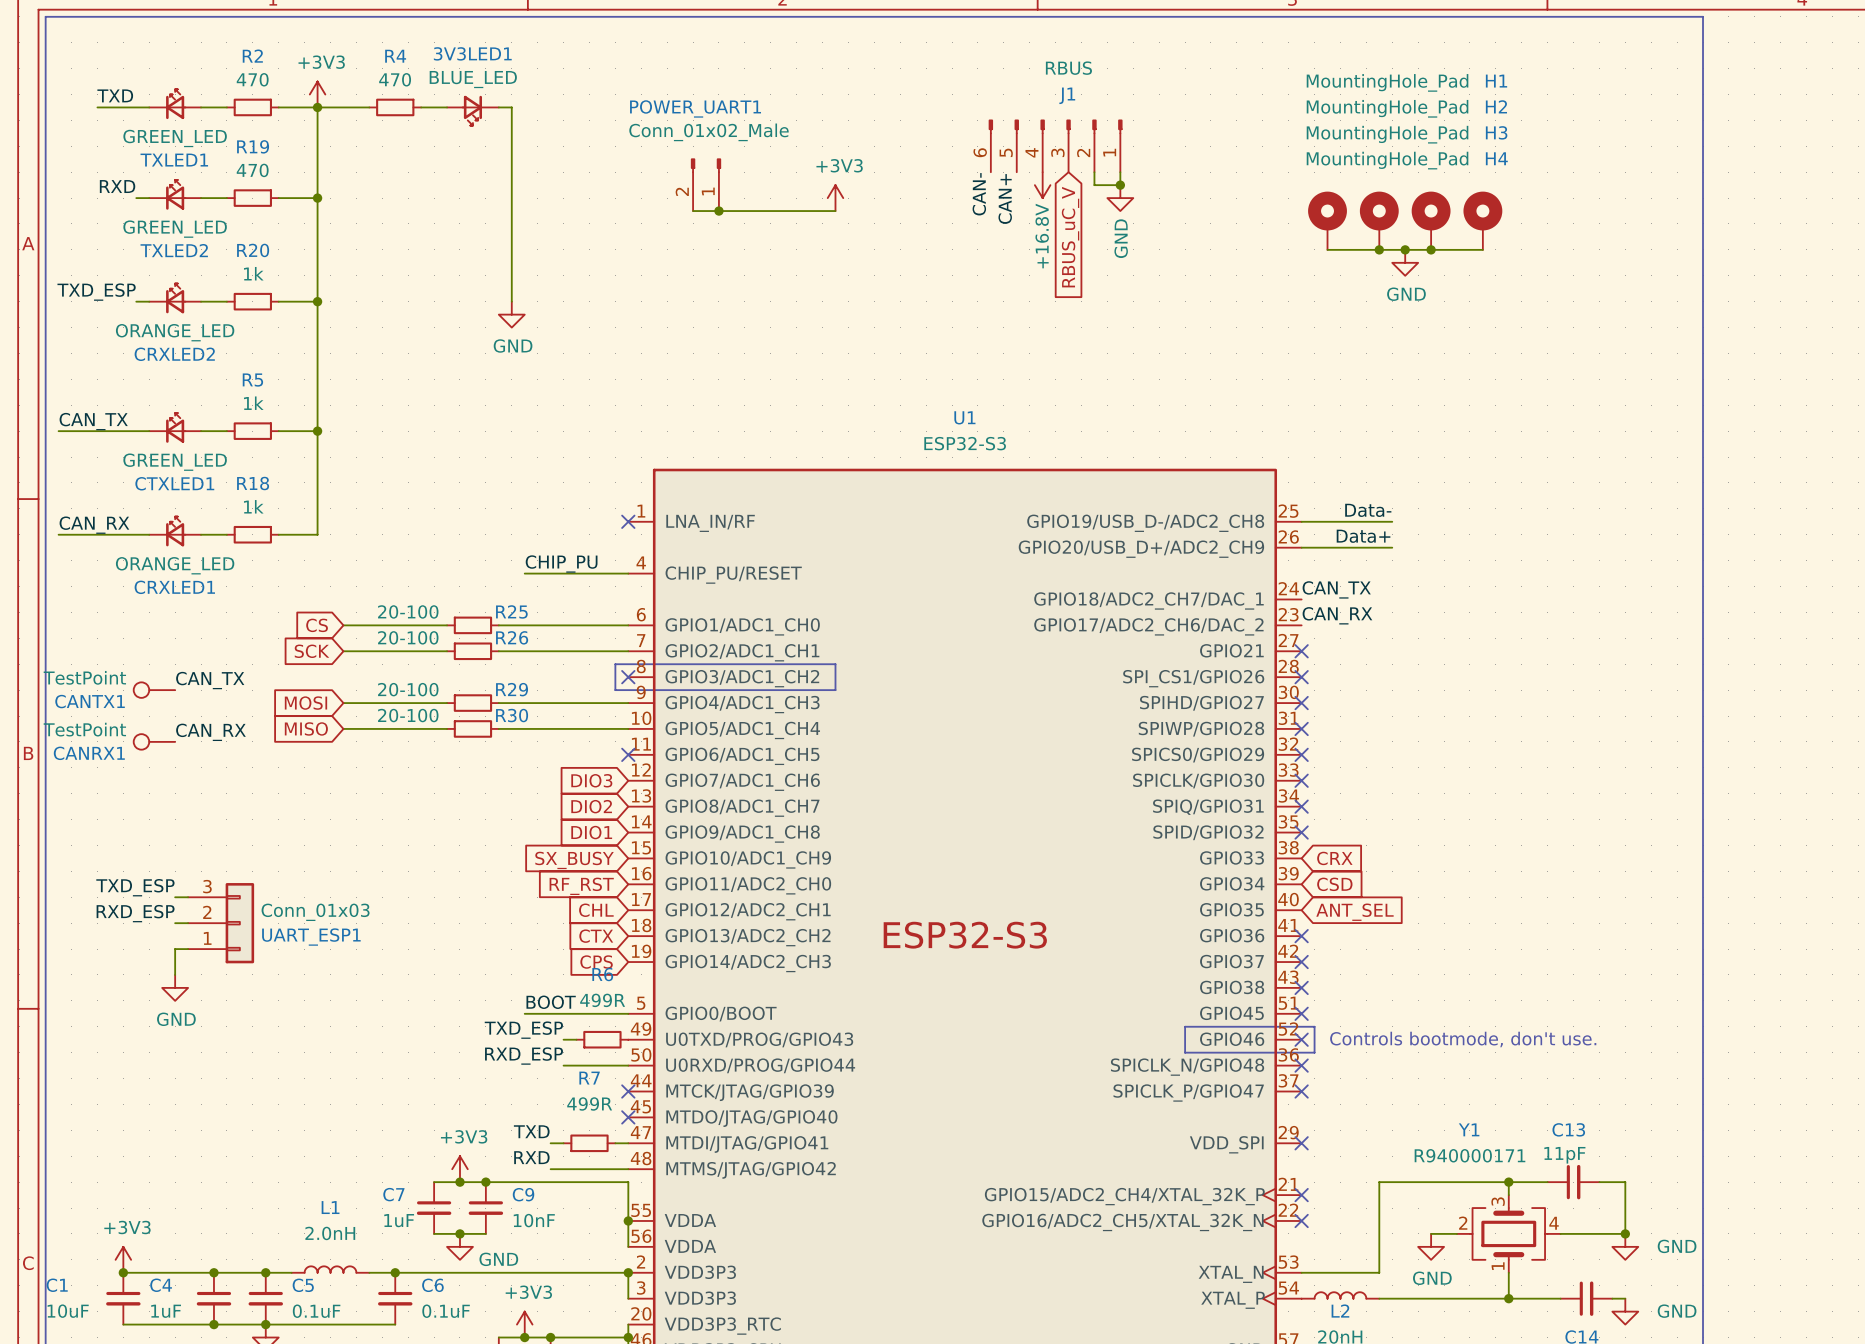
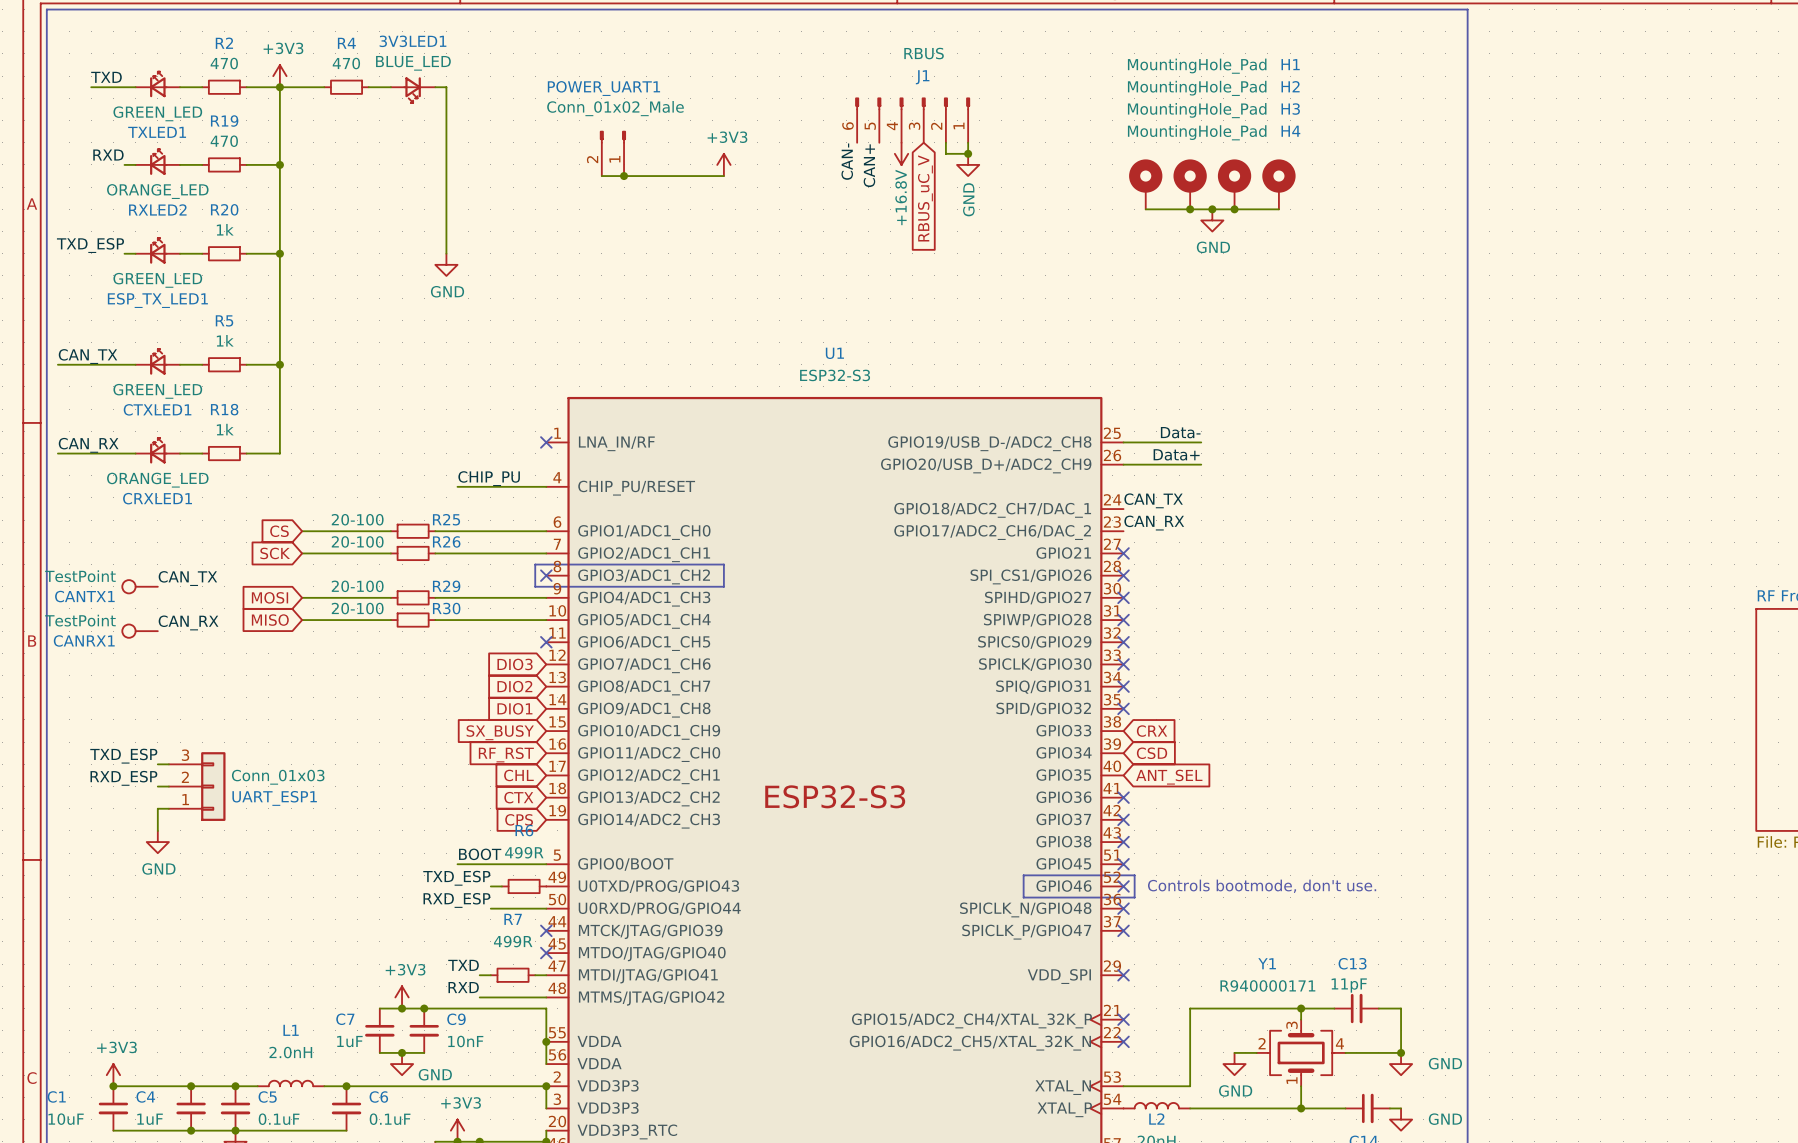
TXLED2 value: GREEN_LED (175, 229) -> ORANGE_LED (157, 191)
TXLED2 name: TXLED2 (174, 250) -> RXLED2 (157, 209)
CRXLED2 value: ORANGE_LED (175, 332) -> GREEN_LED (157, 280)
CRXLED2 name: CRXLED2 (174, 354) -> ESP_TX_LED1 (157, 300)

